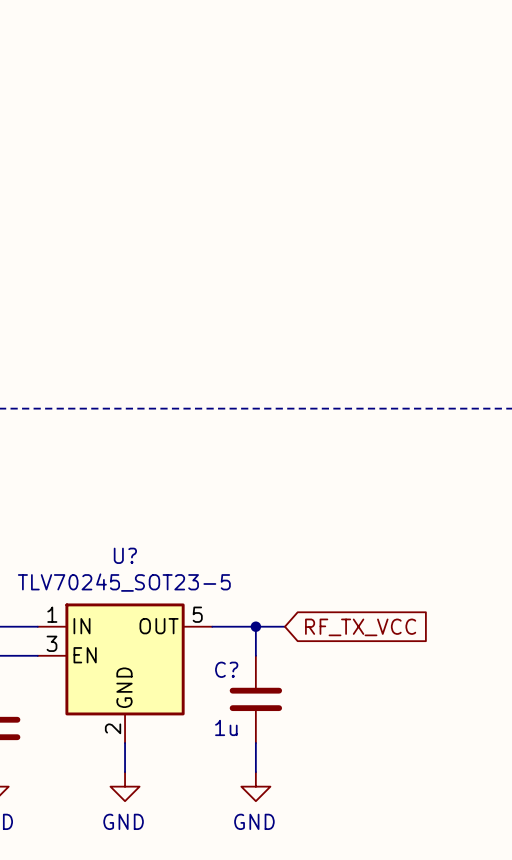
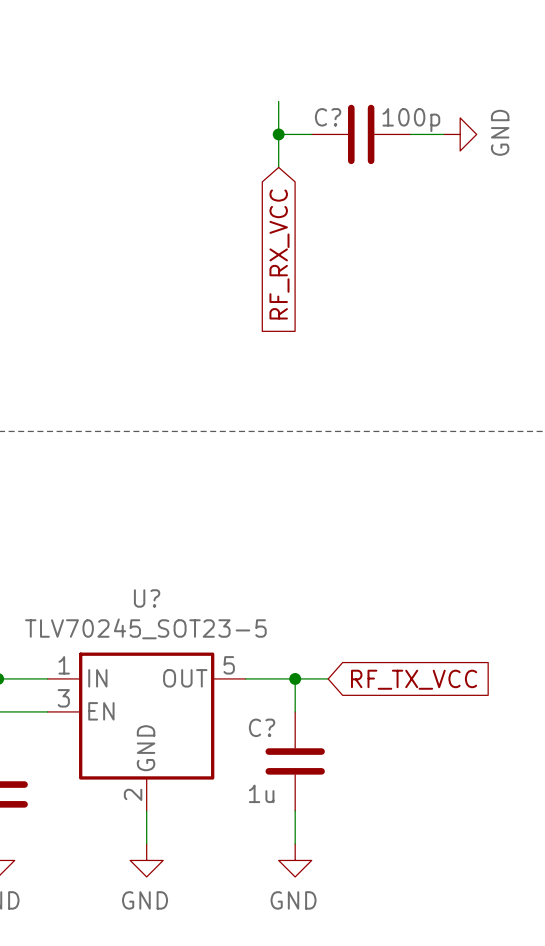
wire: none -> (278, 101) (278, 167)
wire: none -> (278, 134) (311, 134)
junction: none -> (278, 134)
C?: none -> 100p (361, 134)
wire: none -> (410, 134) (443, 134)
power symbol: none -> GND (460, 134)
global label: none -> RF_RX_VCC (279, 254)

